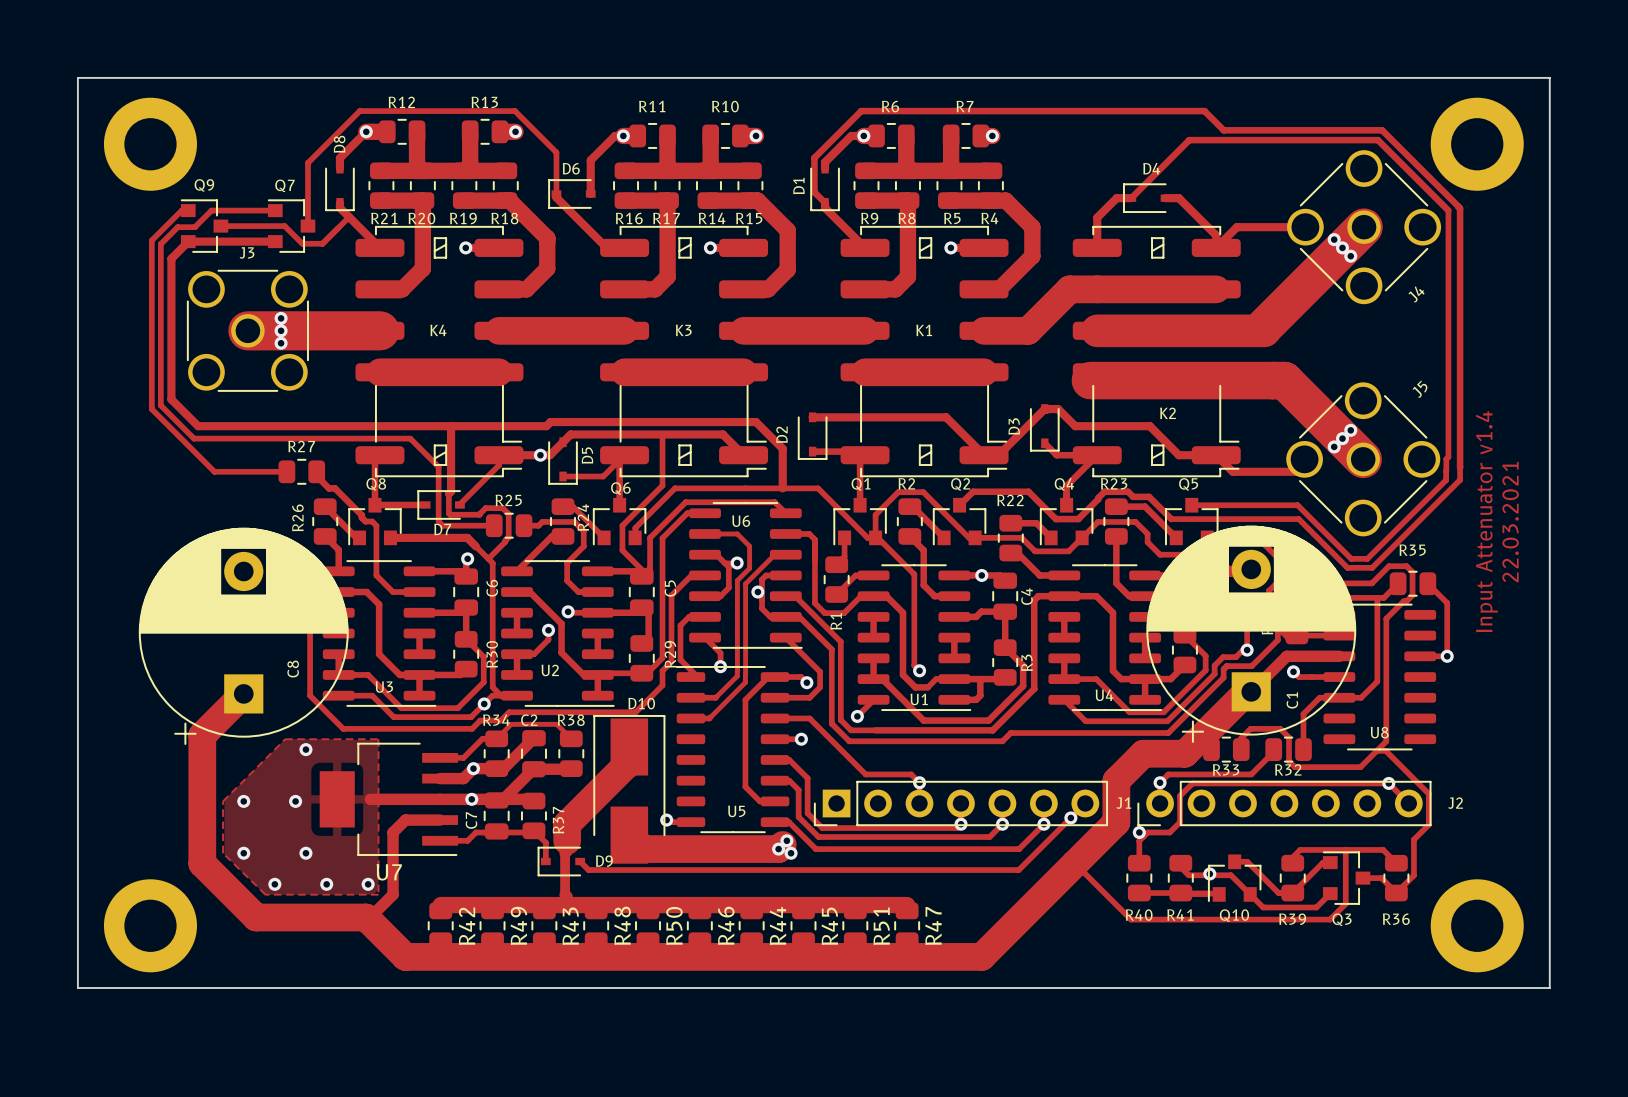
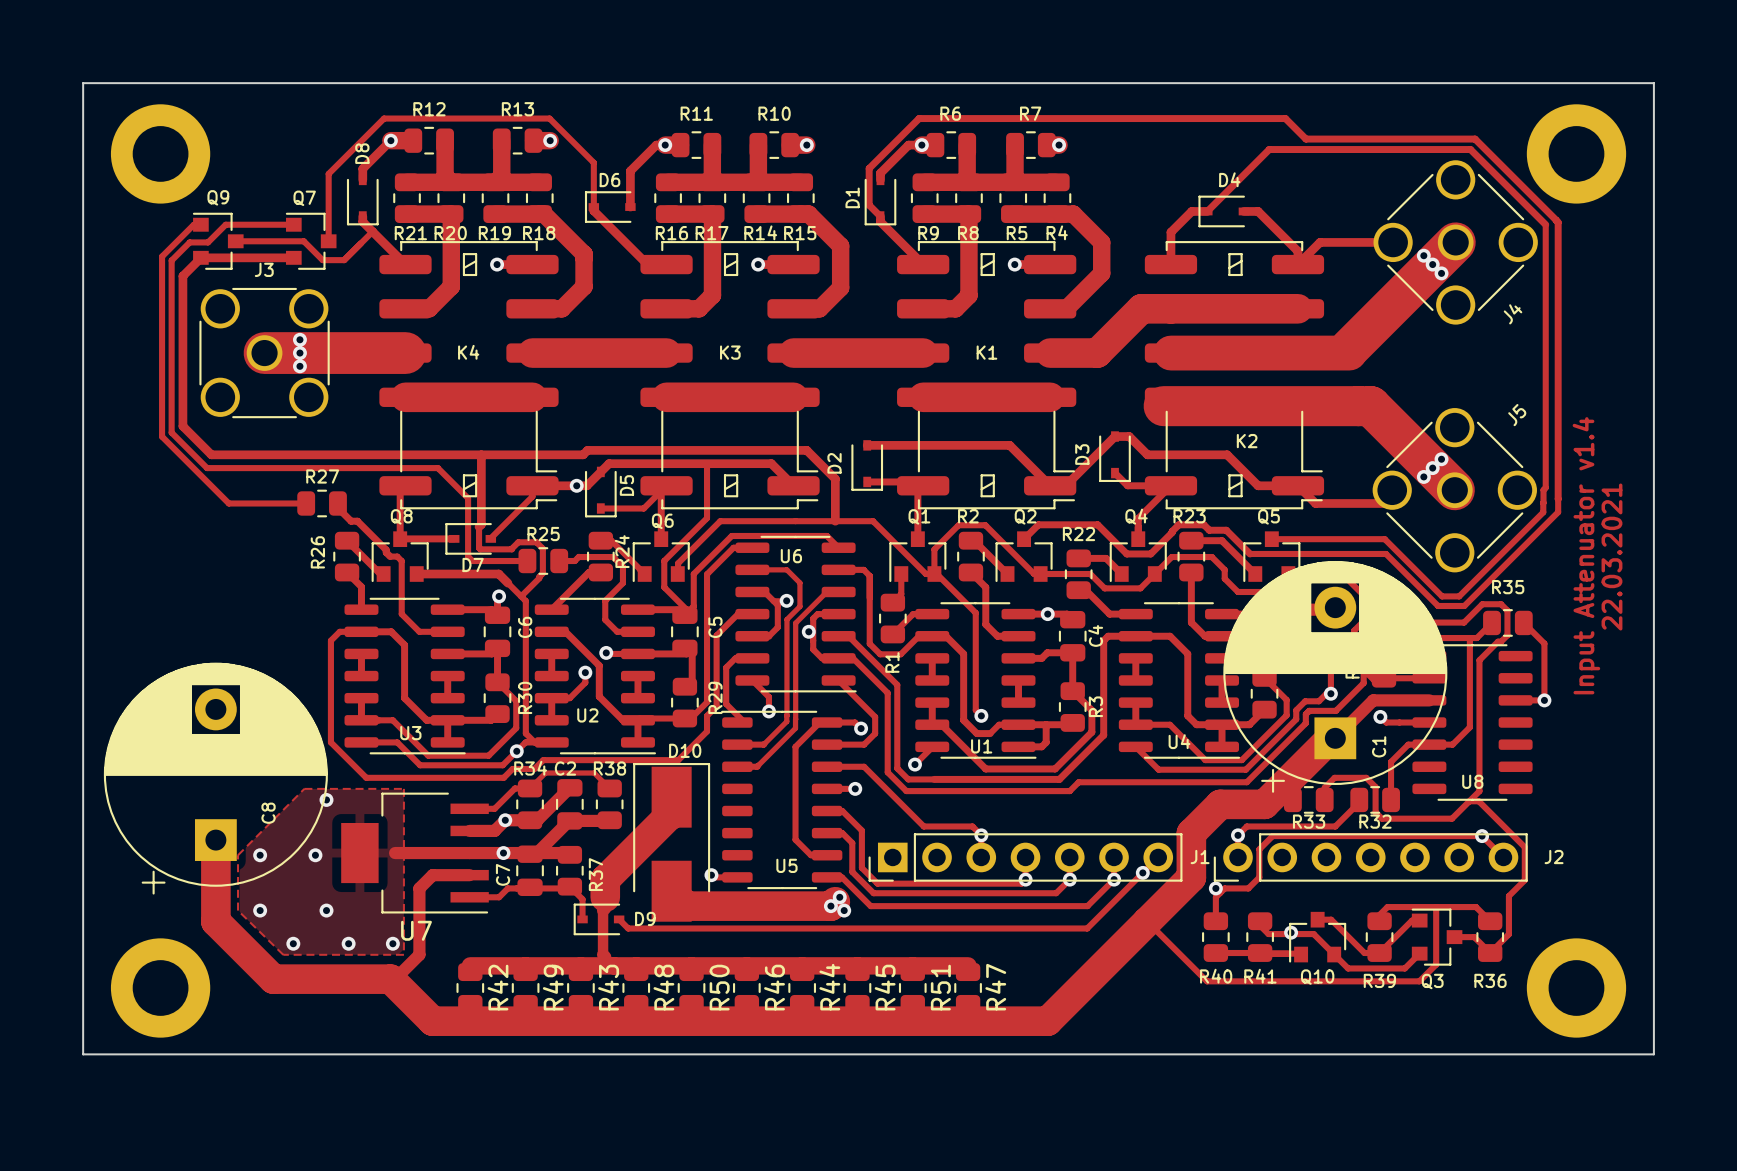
C8 position: (243, 636) -> (215, 778)
track: (243, 693) (202, 735) (202, 791) -> none

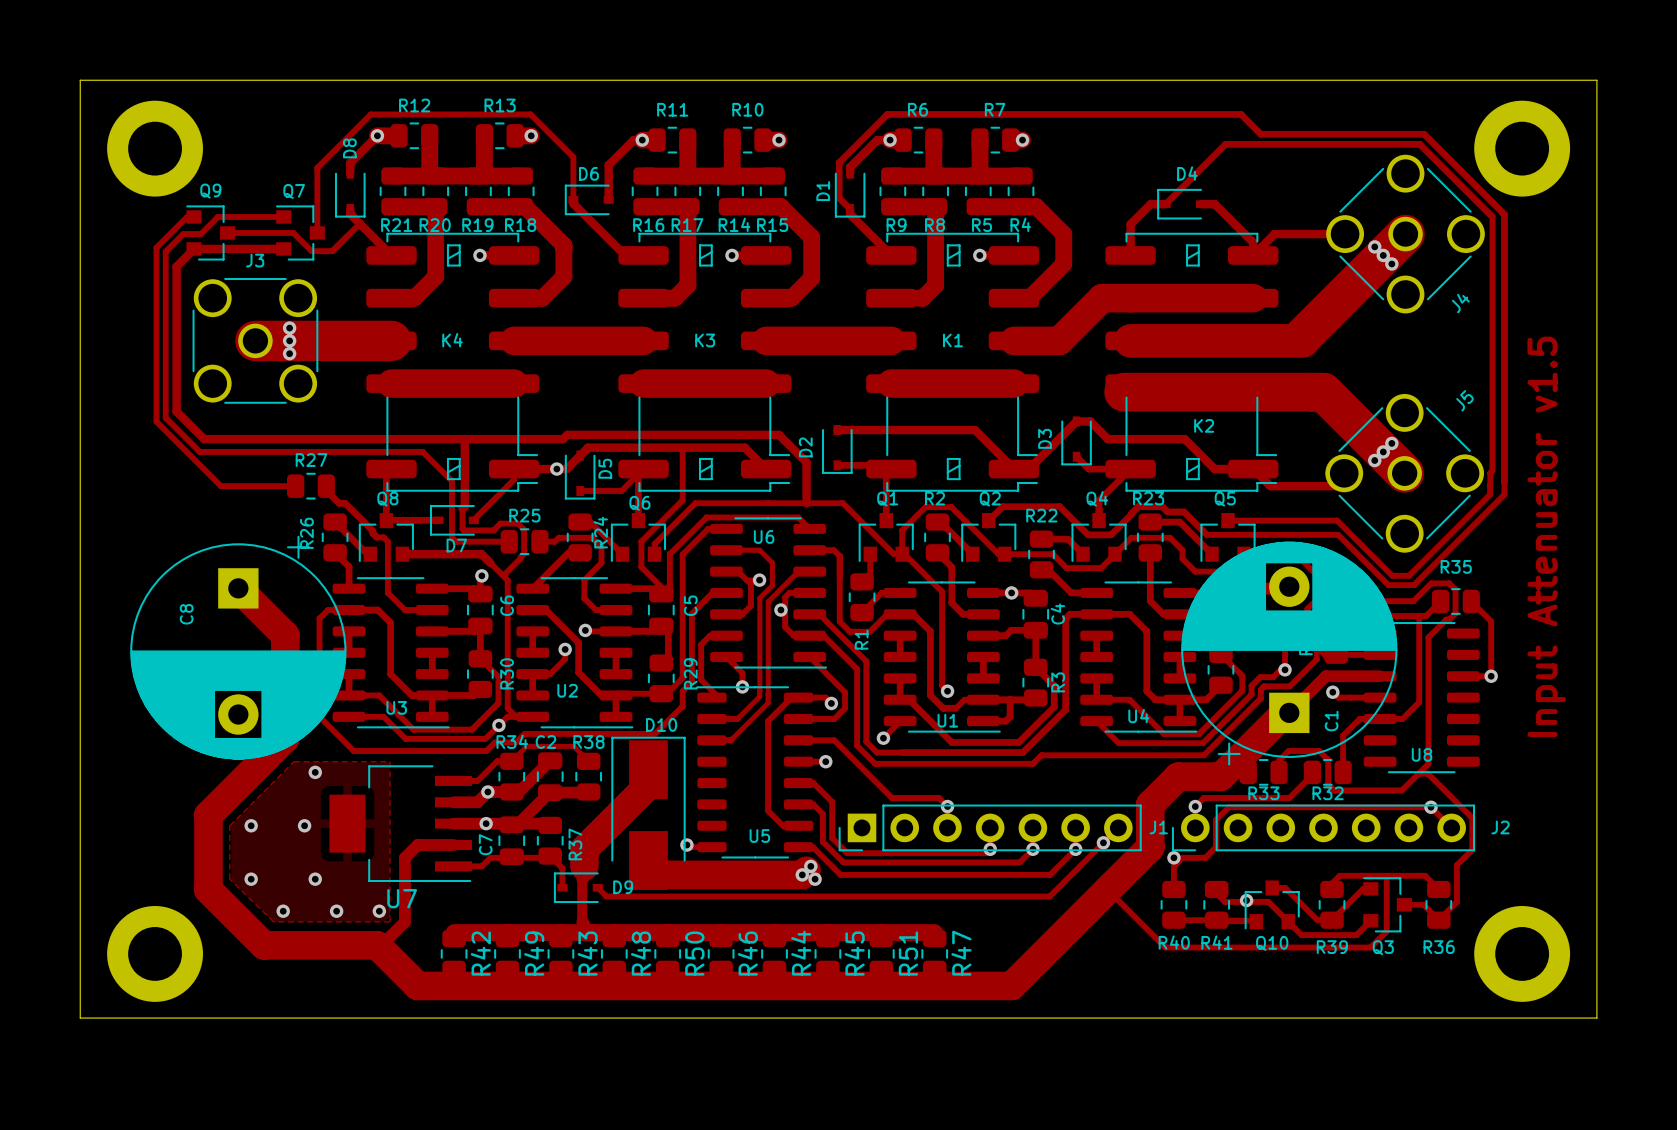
text: Input Attenuator v1.4 (1586, 555) -> Input Attenuator v1.5 (1546, 536)
text: 22.03.2021 (1611, 557) -> none
track: none -> (238, 588) (285, 635) (285, 738) (208, 815)
C8 rotation: 0° (215, 778) -> 180° (238, 647)
track: (469, 853) (395, 853) (392, 855) -> none

